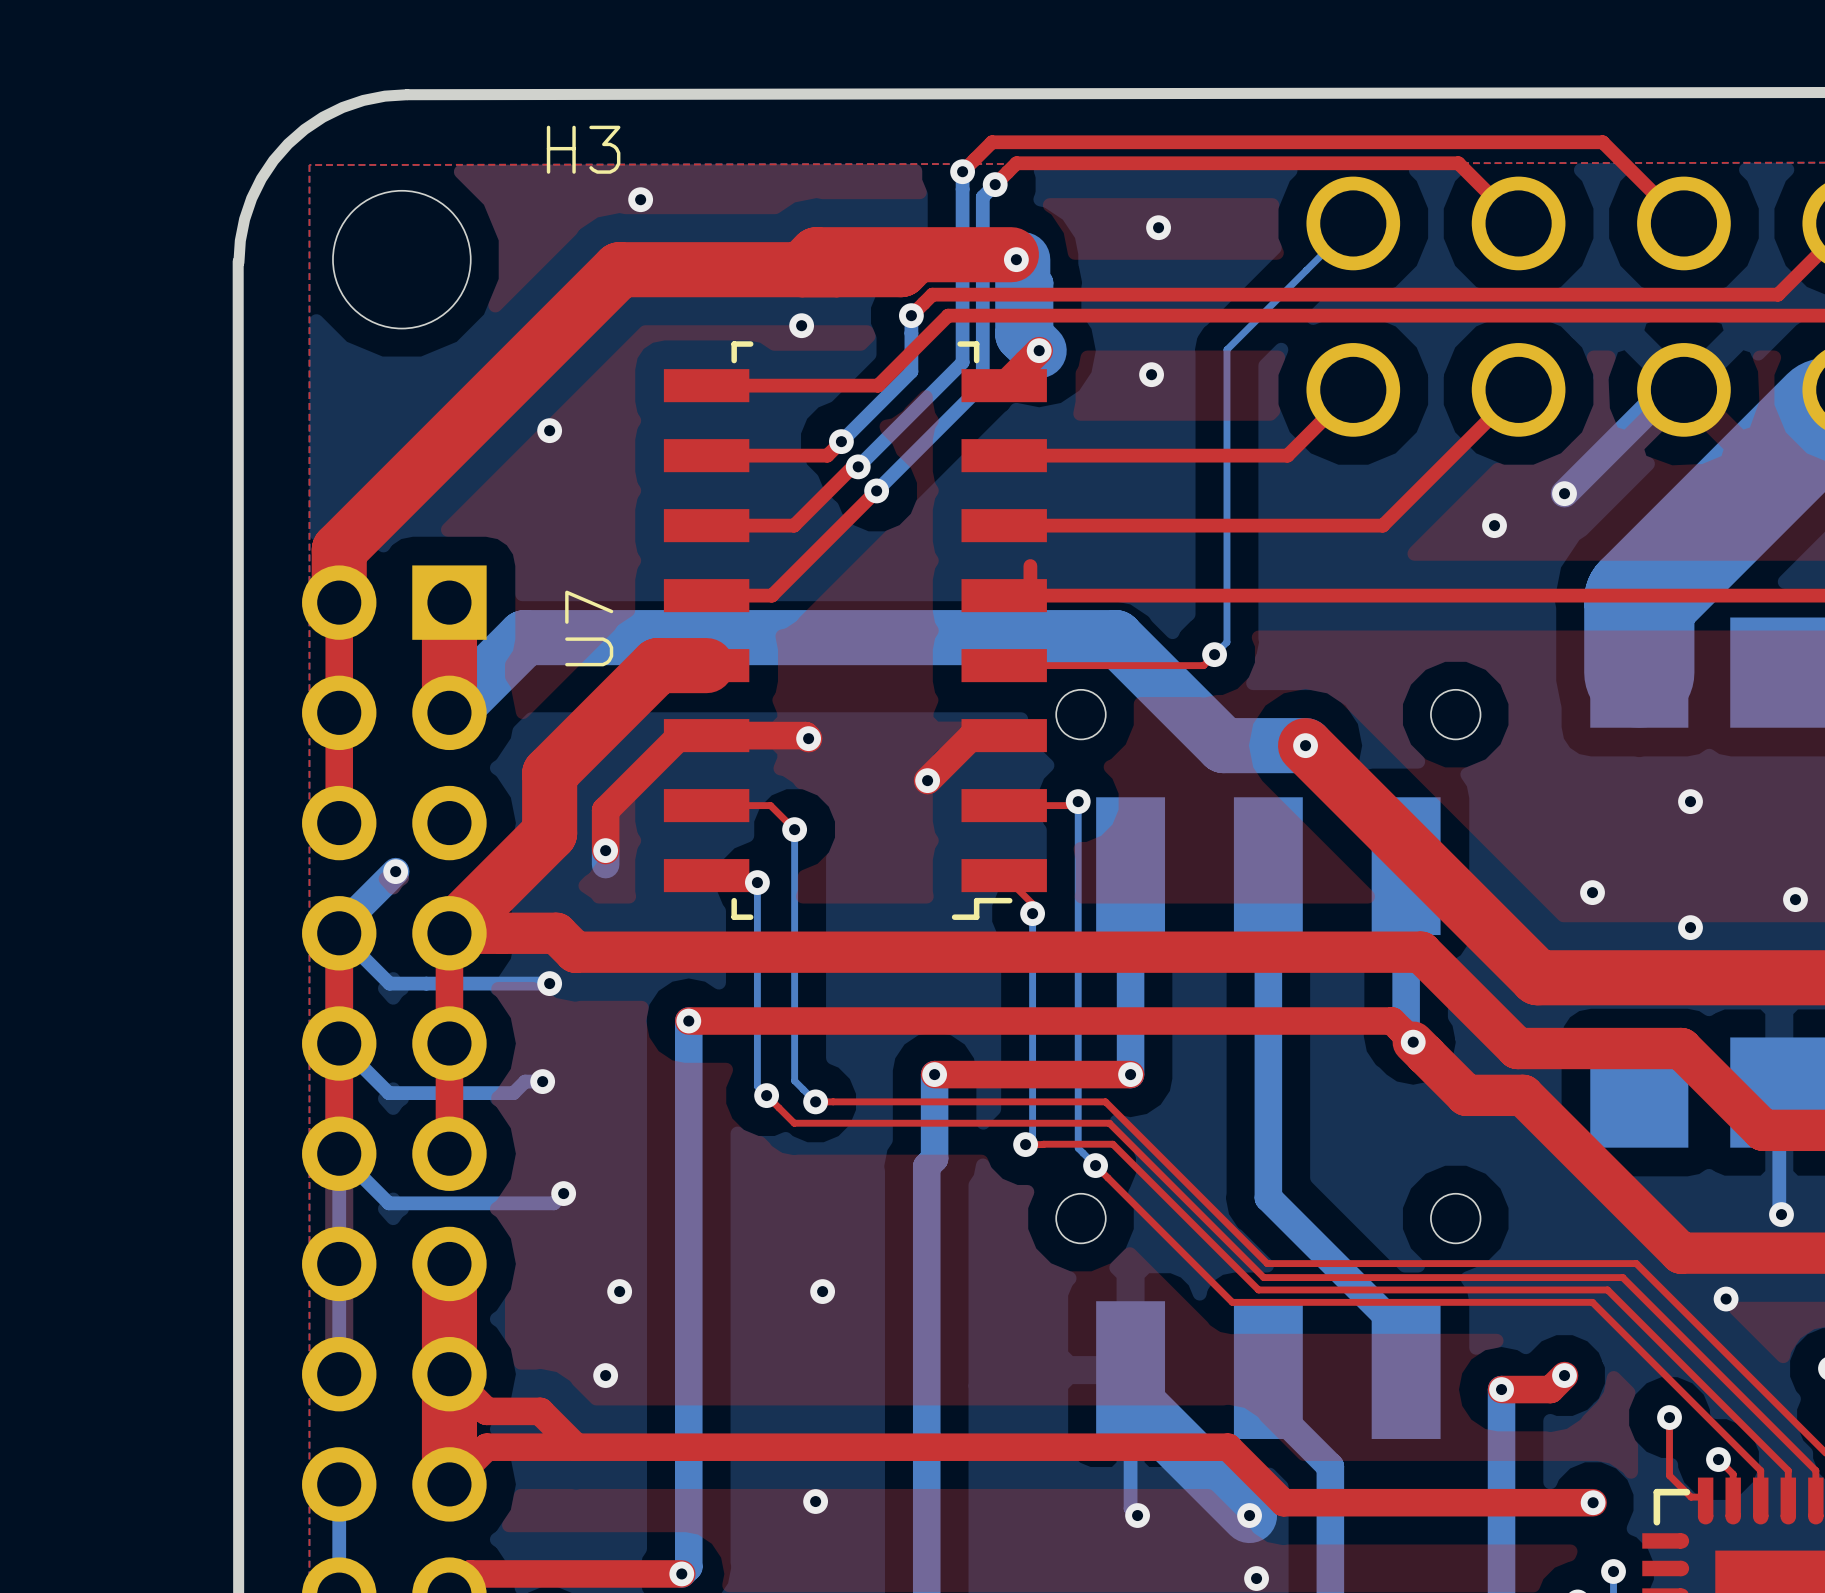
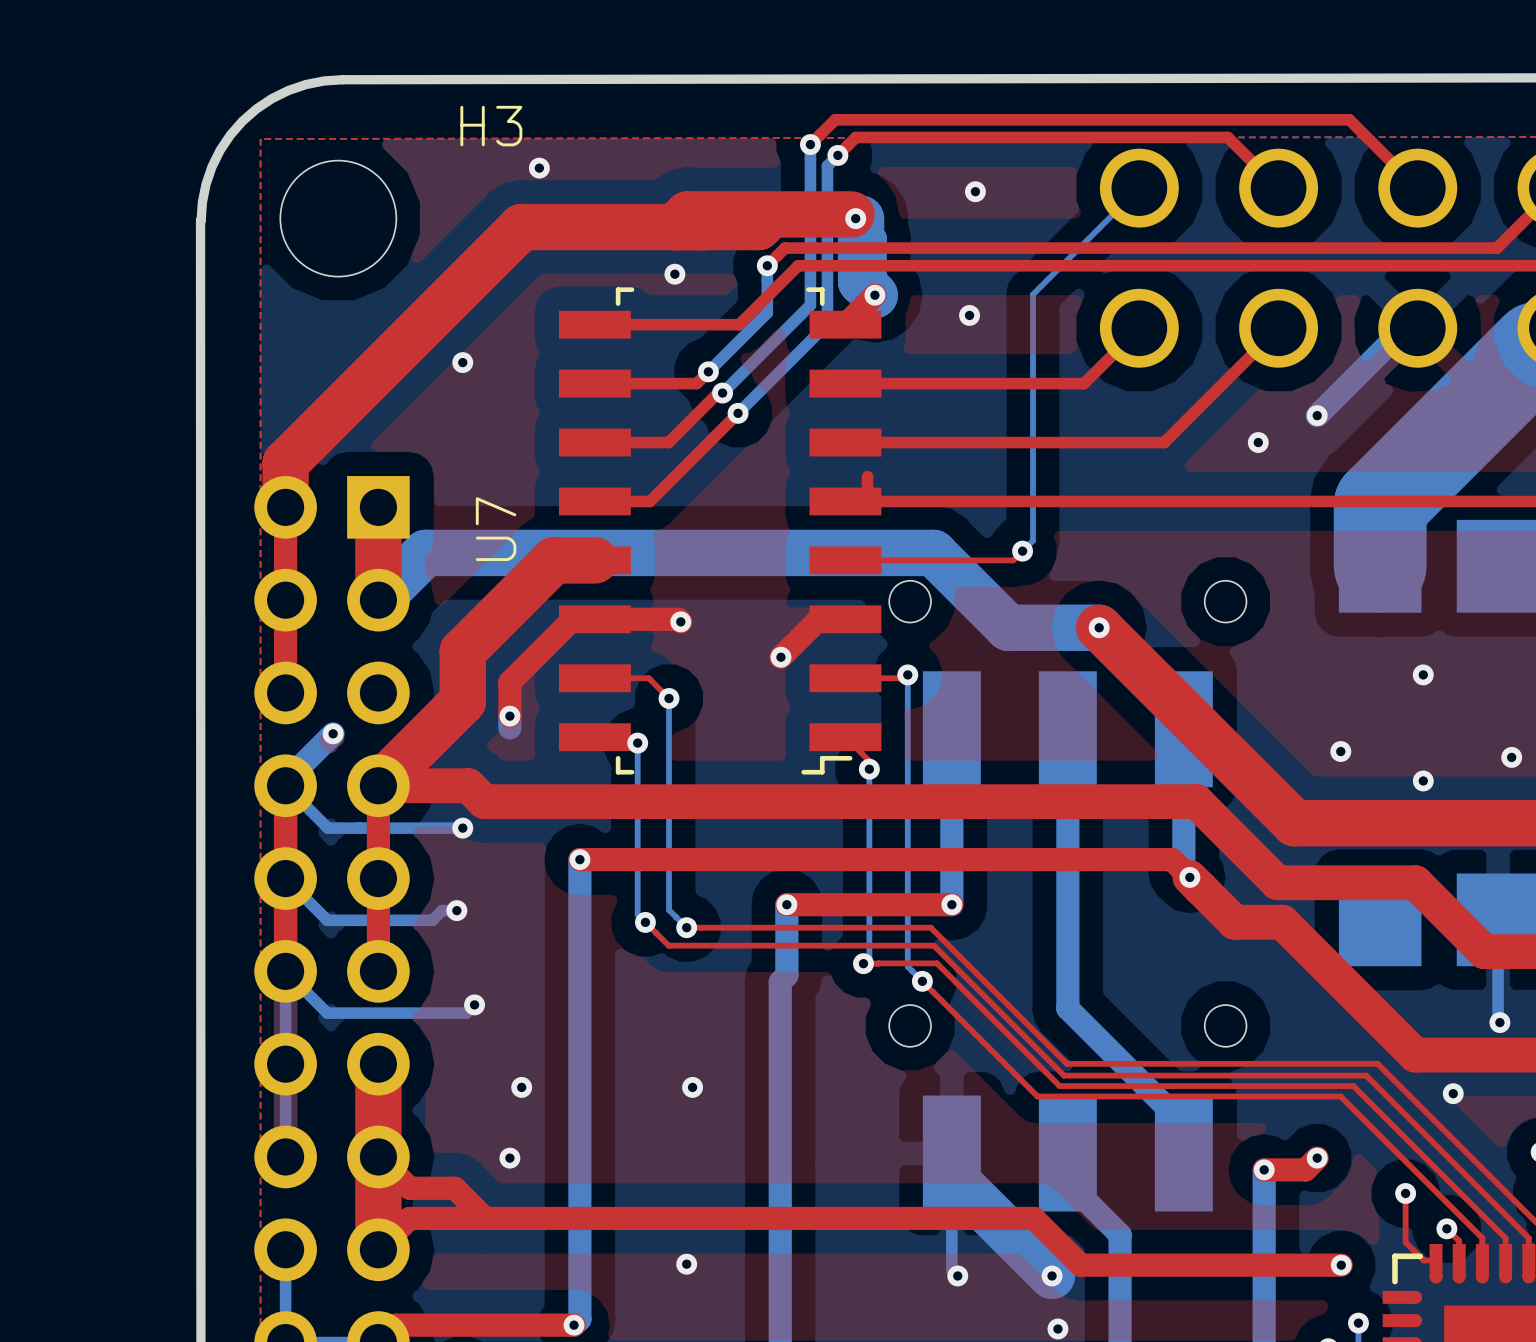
bottom track: (505, 656) (524, 637) (1115, 637) (1223, 745) -> (425, 552) (933, 552) (1008, 627) (1030, 627)

